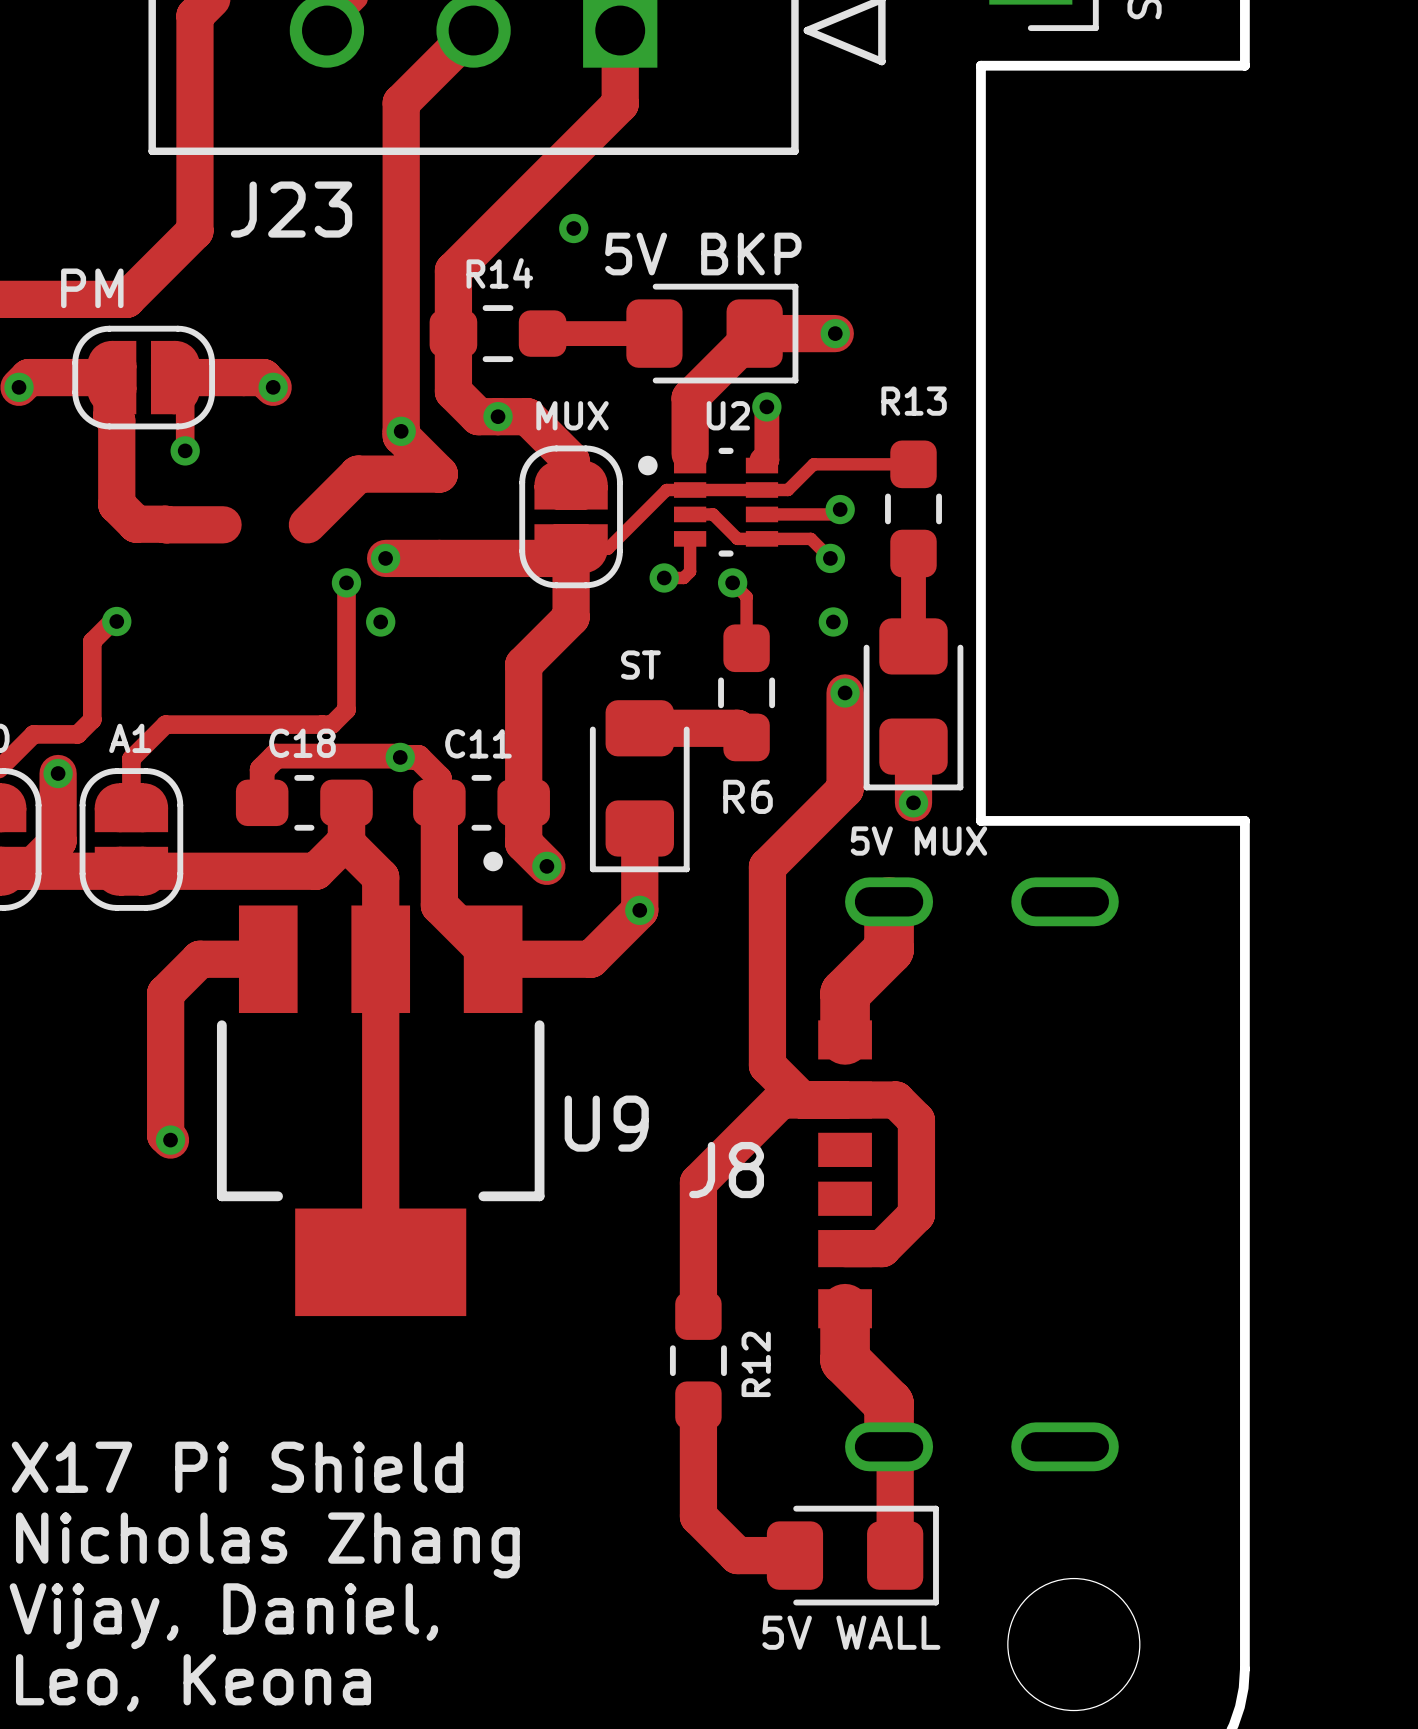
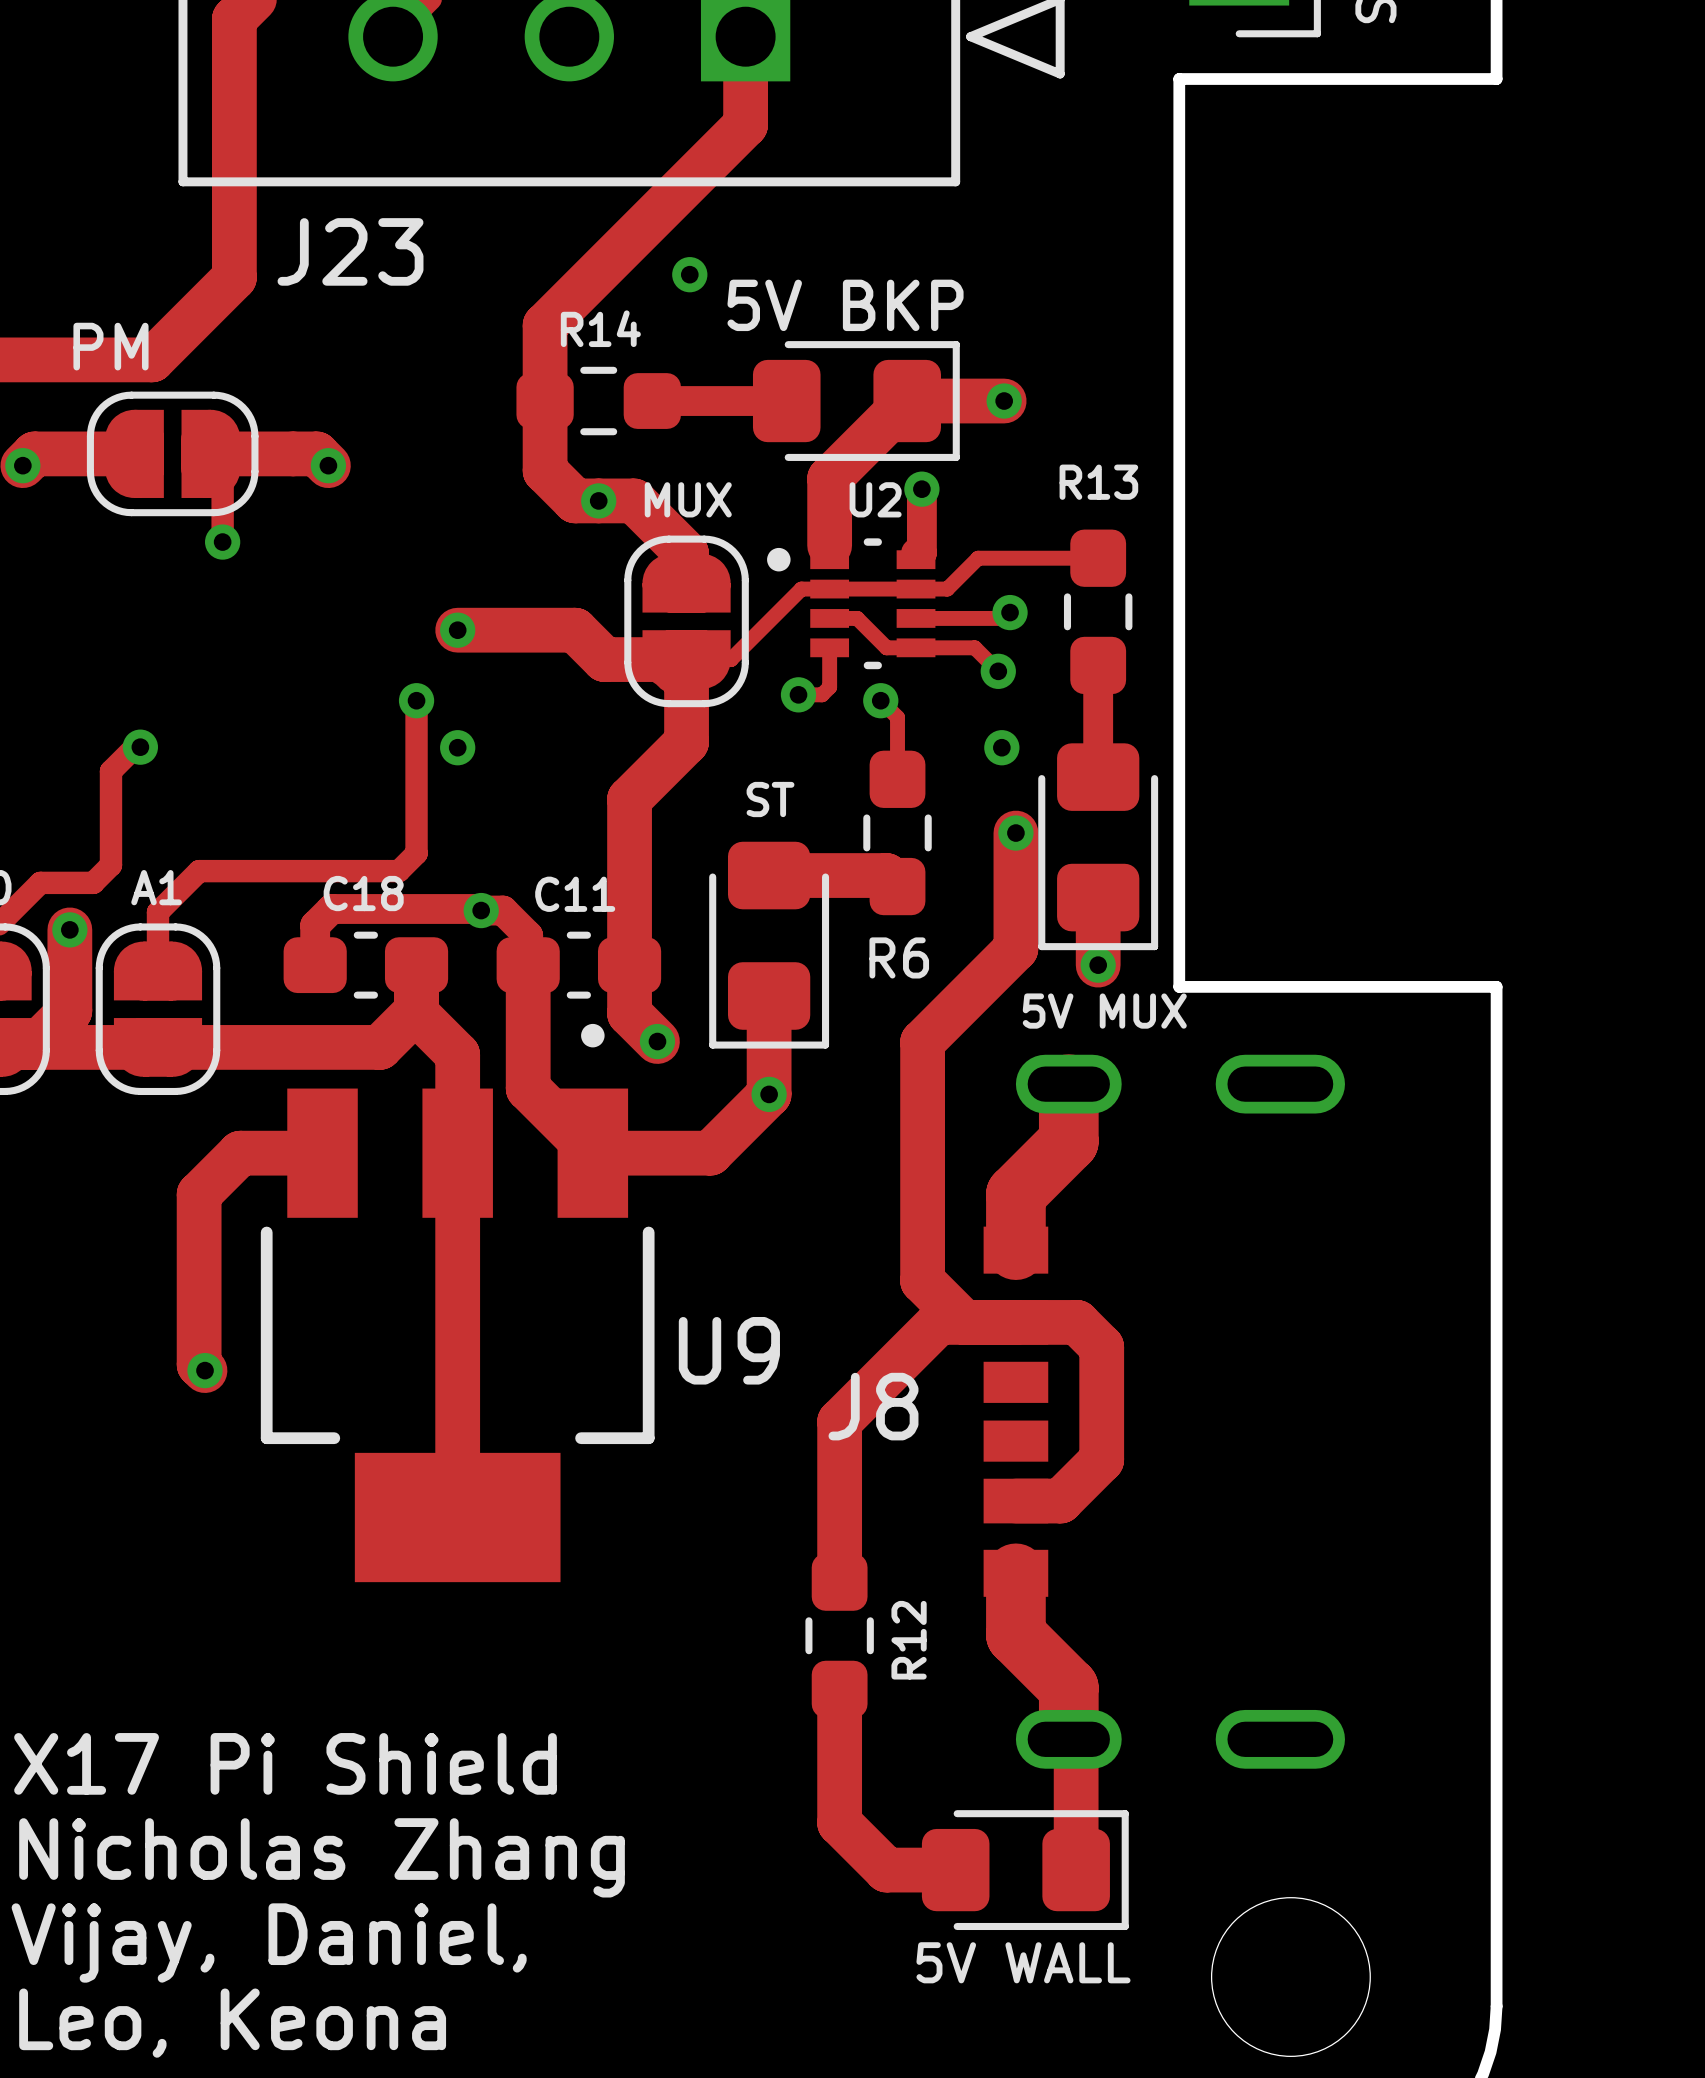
track: (473, 30) (401, 102) (401, 435) (439, 474) (358, 474) (307, 524) -> none
track: (111, 377) (111, 415) (116, 420) (116, 504) (136, 524) (165, 524) -> none
via: (401, 431) -> none
track: (166, 524) (223, 524) -> none
track: none -> (457, 630) (575, 630) (604, 659) (686, 659)
track: (385, 558) (561, 558) -> none
via position: (385, 558) -> (457, 630)

